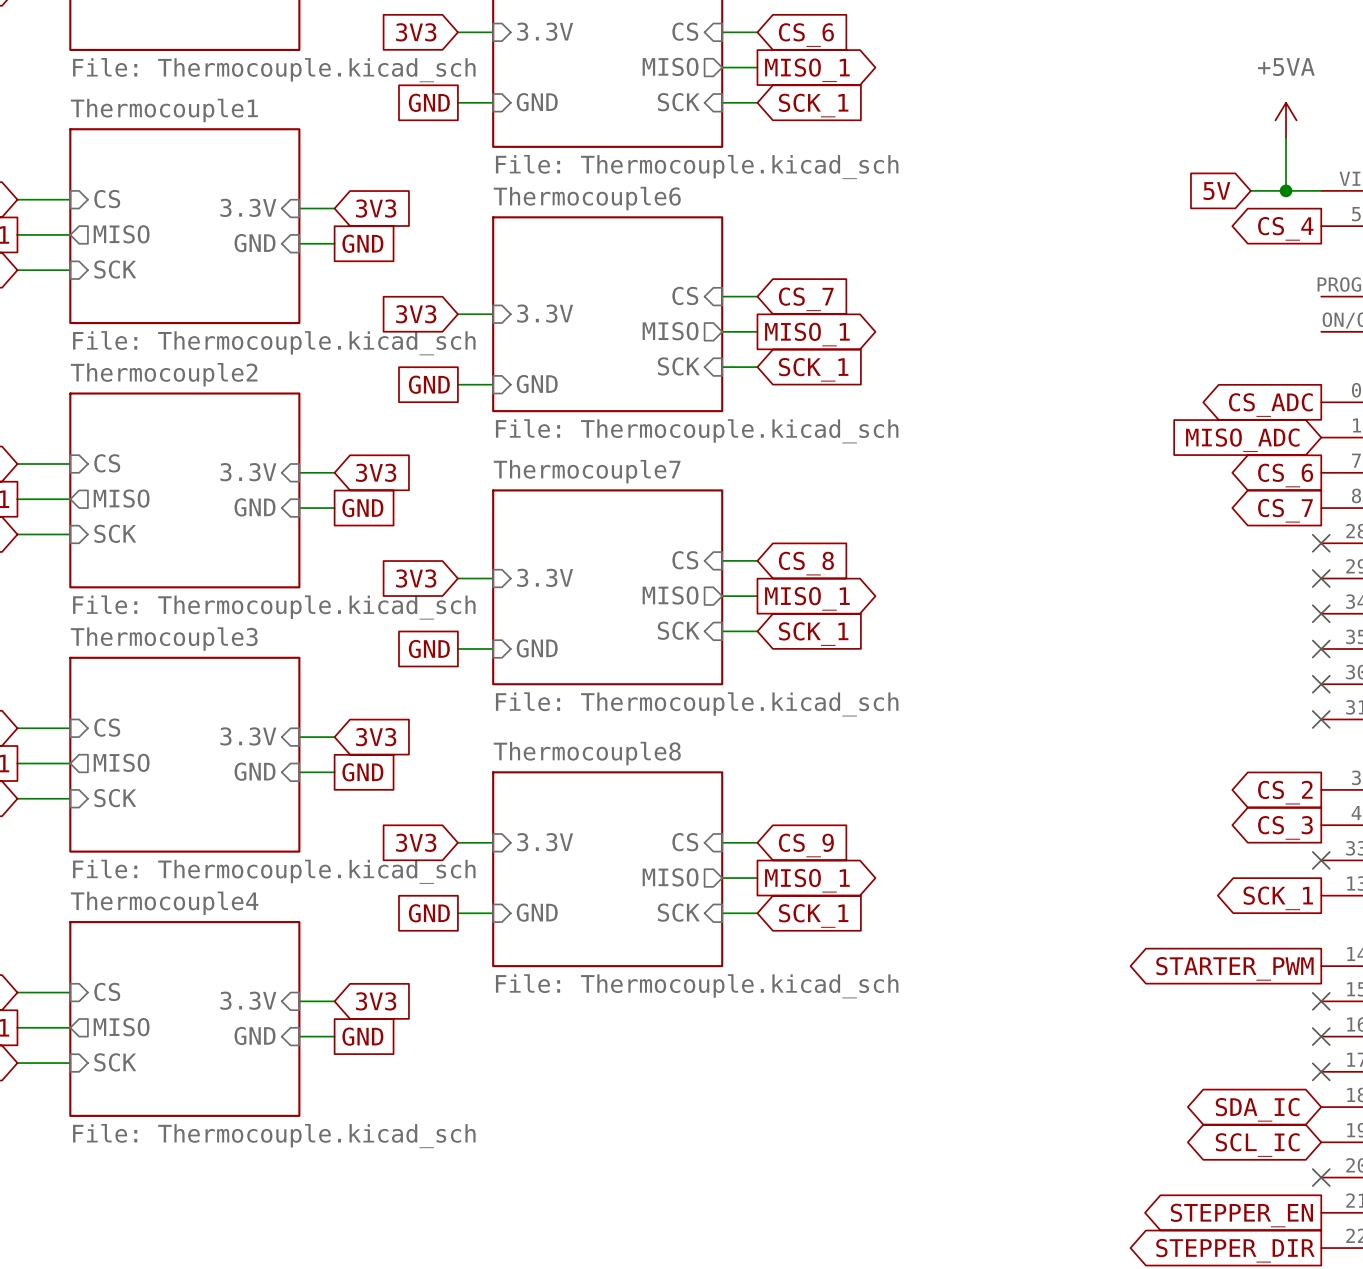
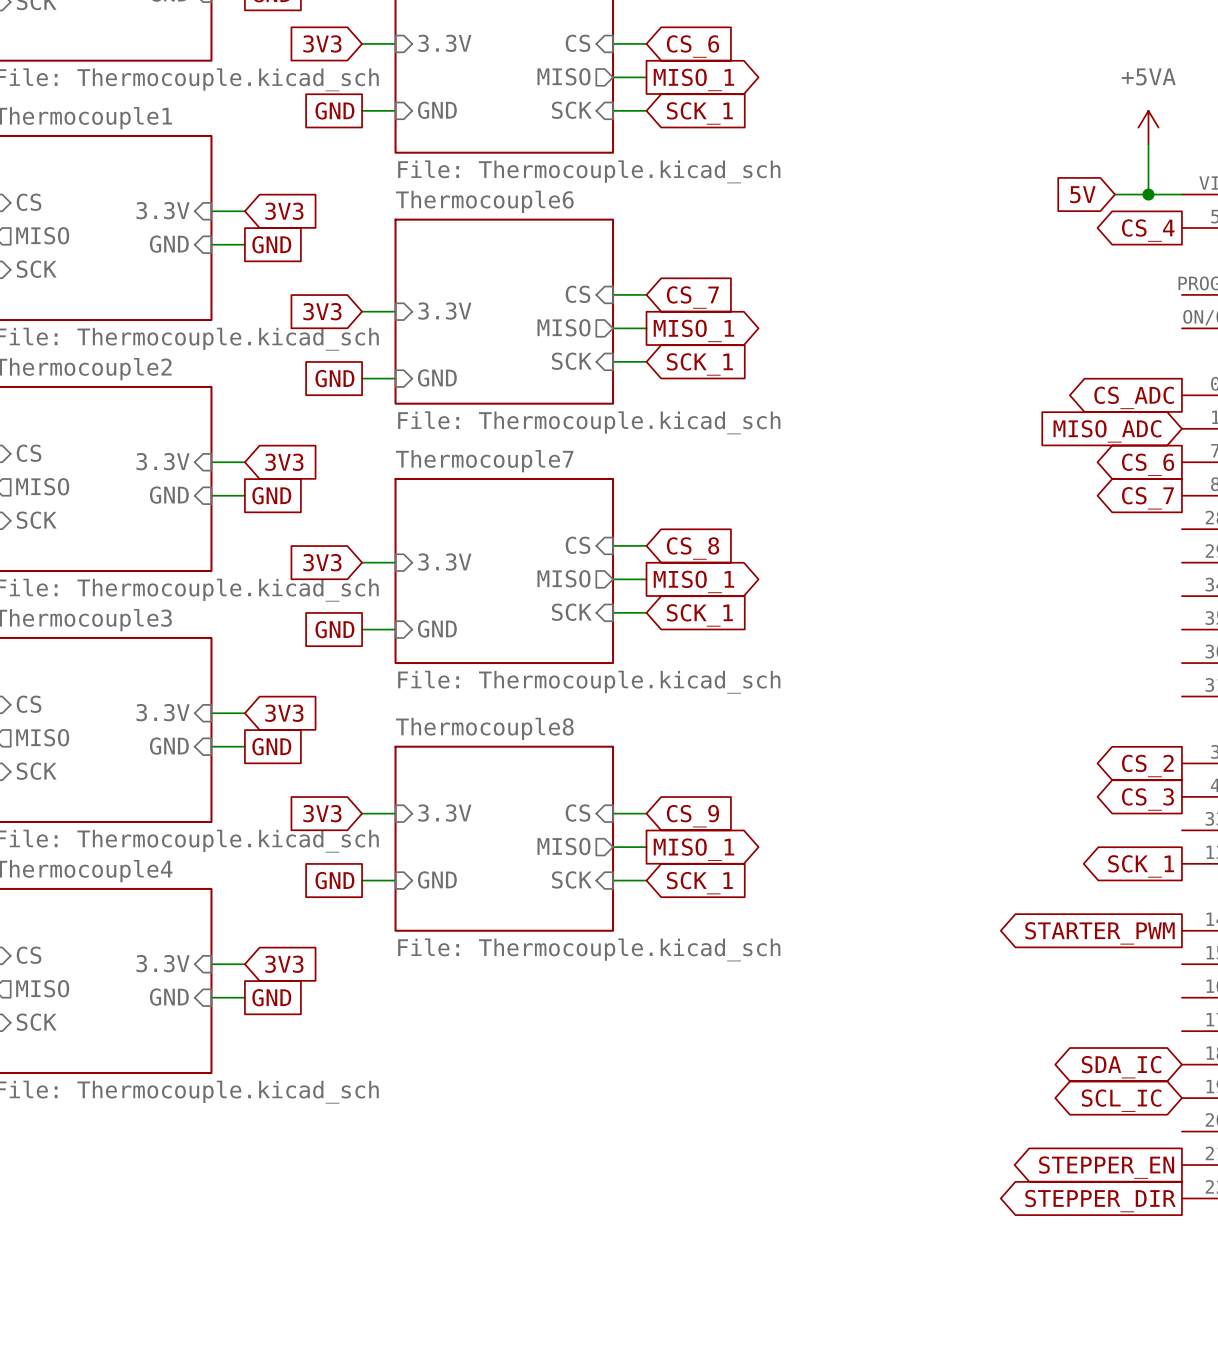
no-connect mark: (1321, 543) -> none
no-connect mark: (1321, 578) -> none
no-connect mark: (1321, 613) -> none
no-connect mark: (1321, 648) -> none
no-connect mark: (1321, 684) -> none
no-connect mark: (1321, 719) -> none
no-connect mark: (1321, 860) -> none
no-connect mark: (1321, 1001) -> none
no-connect mark: (1321, 1036) -> none
no-connect mark: (1321, 1071) -> none
no-connect mark: (1321, 1177) -> none

